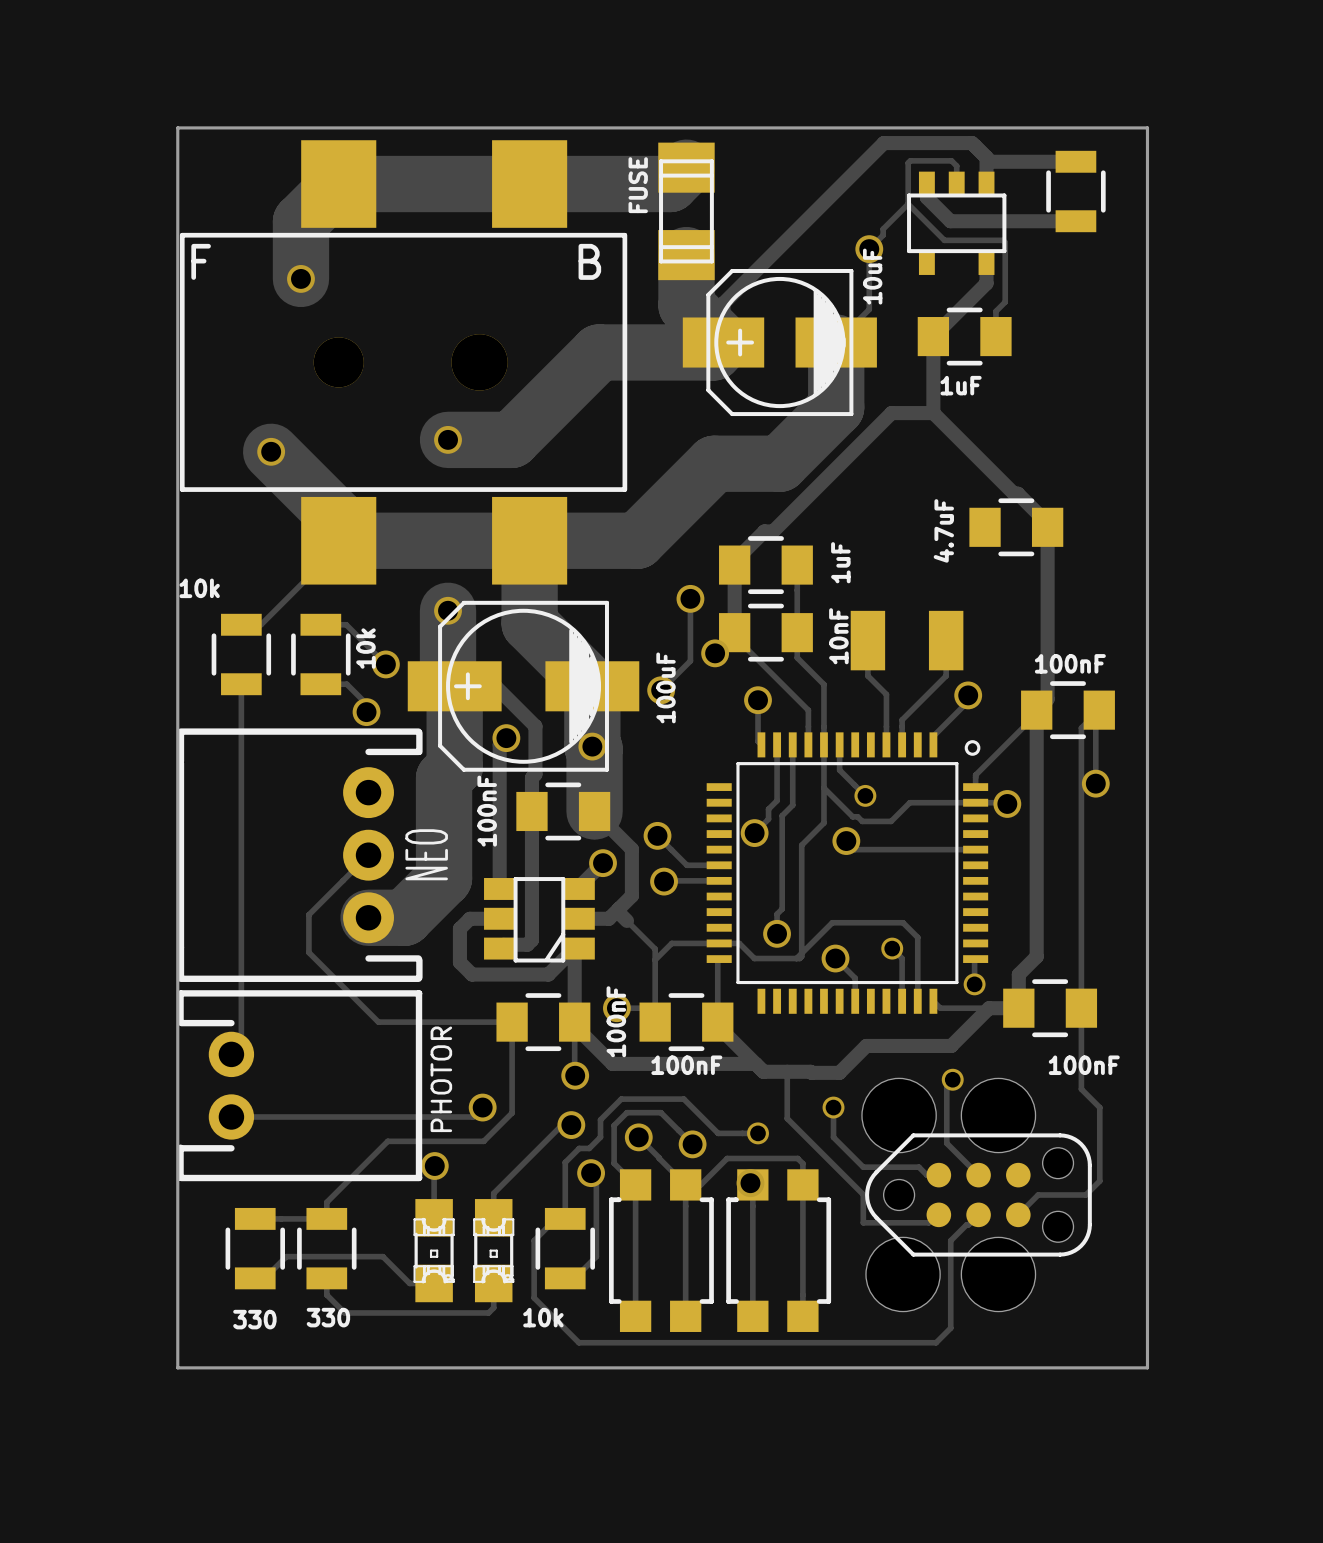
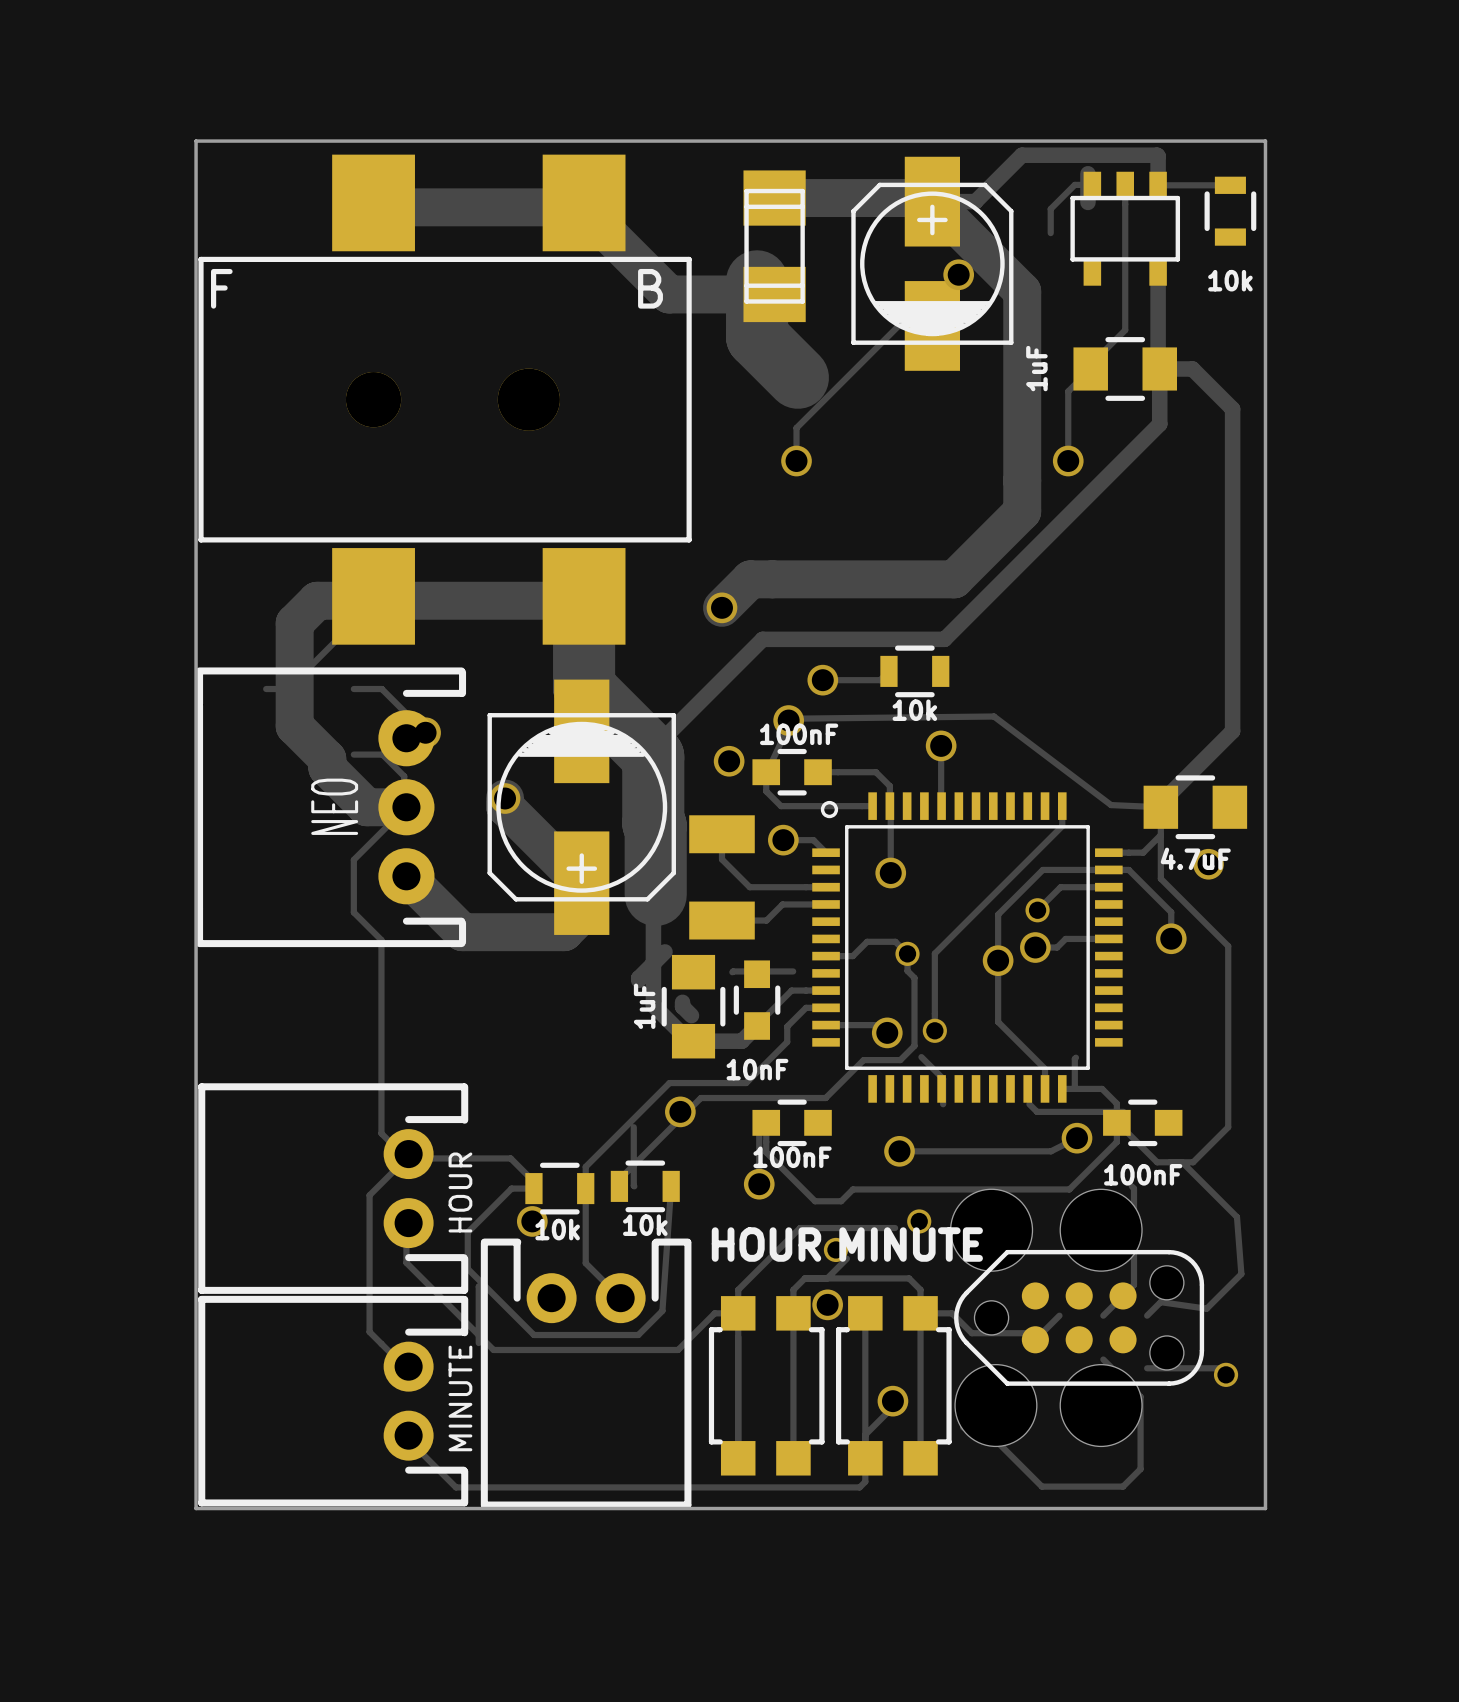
track: (1075, 161) (990, 161) (972, 143) (883, 143) (723, 303) (723, 342) (713, 352) (599, 352) (511, 439) (448, 439) -> none
track: (686, 167) (670, 184) (338, 184) (300, 221) (300, 278) -> none
track: none -> (1092, 184) (1074, 184) (1050, 209) (1050, 233)
track: none -> (1125, 184) (1125, 330) (1090, 364) (1090, 368) (1068, 391) (1068, 461)
track: none -> (1158, 184) (1157, 155) (1021, 155) (975, 201) (932, 201)
track: none -> (1158, 185) (1230, 185)
track: none -> (774, 198) (928, 198) (1022, 291) (1022, 511) (954, 579) (750, 579) (722, 607)
track: (926, 183) (926, 197) (950, 221) (1075, 221) -> none
track: (956, 183) (956, 166) (951, 160) (910, 160) (908, 163) (908, 204) -> none
part value: FUSE (638, 185) -> none
track: none -> (371, 207) (581, 207) (669, 294) (774, 294)
part: (1075, 191) -> none
part: none -> 10k (1230, 211)
track: (908, 204) (944, 240) (1003, 240) (1005, 242) (1005, 302) (995, 311) (995, 336) -> none
track: (908, 204) (883, 229) (883, 235) (869, 249) (869, 309) (836, 342) (836, 407) (779, 463) (714, 463) (637, 540) (338, 540) (338, 519) (271, 451) -> none
part position: (686, 211) -> (774, 246)
part position: (956, 223) -> (1125, 228)
part: none -> (932, 263)
track: none -> (1158, 272) (1158, 367) (1159, 368)
track: (986, 263) (986, 283) (933, 336) (933, 413) -> none
via: (300, 278) -> none
track: none -> (932, 325) (898, 325) (796, 427) (796, 461)
track: none -> (1159, 368) (1192, 368) (1232, 409) (1232, 731) (1160, 802) (1160, 807)
track: none -> (1159, 368) (1159, 424) (944, 639) (762, 639) (653, 748) (653, 1005) (689, 1041) (741, 1041) (791, 990) (826, 990)
part position: (964, 336) -> (1125, 368)
part: 10uF (779, 342) -> none
part value rotation: 0° (961, 385) -> 90° counterclockwise (1036, 368)
part value position: 1uF (961, 385) -> 1uF (1036, 368)
track: (933, 413) (1013, 493) (1017, 493) (1047, 523) (1047, 699) (1036, 710) (1036, 714) -> none
track: (933, 413) (891, 413) (773, 531) (764, 531) (734, 561) (734, 636) (808, 710) (808, 744) -> none
via: none -> (796, 461)
via: none -> (1068, 461)
via: (448, 439) -> none
via: (271, 451) -> none
part: 4.7uF (1016, 527) -> none
via: none -> (722, 607)
part: 1uF (765, 565) -> none
track: (797, 565) (797, 657) (823, 684) (823, 823) (801, 845) (801, 956) (799, 958) (754, 958) (739, 943) (671, 943) (655, 960) -> none
track: (690, 598) (690, 660) (661, 690) -> none
via: (690, 598) -> none
track: none -> (888, 671) (880, 680) (822, 680)
part: none -> 10k (914, 671)
track: (448, 610) (448, 679) (454, 686) -> none
via: (448, 610) -> none
via: none -> (822, 680)
part: 10nF (765, 632) -> none
track: (867, 640) (867, 675) (886, 694) (886, 744) -> none
part rotation: 0° (907, 640) -> 90° clockwise (722, 877)
part position: (907, 640) -> (722, 877)
track: (946, 640) (946, 675) (902, 719) (902, 744) -> none
part: 10k (241, 654) -> none
part: 10k (320, 654) -> none
track: none -> (581, 731) (581, 600) (317, 600) (294, 623) (294, 726) (327, 758) (327, 767) (366, 807) (406, 807) (353, 859) (353, 912) (381, 940) (381, 1133) (406, 1158)
part value: 100nF (1070, 663) -> 4.7uF (1195, 858)
track: none -> (941, 745) (941, 805)
via: none -> (941, 745)
track: (241, 684) (241, 1044) (231, 1054) -> none
track: (454, 686) (454, 767) (444, 778) (444, 878) (404, 917) (368, 917) -> none
track: (454, 686) (495, 686) (535, 726) (535, 774) (531, 777) (531, 940) (527, 944) (503, 944) (499, 948) (504, 948) -> none
part: 100uF (523, 686) -> none
track: (968, 695) (968, 701) (933, 736) (933, 744) -> none
via: (968, 695) -> none
part: none -> 100nF (792, 772)
track: none -> (818, 772) (875, 772) (889, 786) (890, 873)
track: (758, 700) (758, 741) (761, 744) -> none
via: (758, 700) -> none
part position: (1067, 710) -> (1195, 807)
track: (1099, 710) (1081, 728) (1081, 1089) (1099, 1107) (1099, 1181) -> (1182, 1162) (1236, 1217) (1241, 1274) (1212, 1302)
via: (366, 712) -> none
track: (1095, 713) (1095, 783) -> none
track: (1036, 714) (975, 775) (975, 787) -> none
track: (1036, 714) (1036, 956) (1018, 974) (1018, 1008) (989, 1008) (951, 1045) (866, 1045) (839, 1072) (763, 1071) (717, 1026) (719, 959) -> none
track: none -> (505, 798) (505, 806) (581, 883) (581, 914) (564, 932) (462, 932) (406, 876)
via: none -> (505, 798)
track: none -> (872, 806) (781, 806) (766, 791) (766, 772) (792, 718) (994, 716) (1111, 805) (1160, 807)
track: none -> (1062, 806) (1062, 826) (934, 953) (934, 1030)
part: none -> (581, 807)
track: none -> (1160, 807) (1160, 878) (1228, 946) (1228, 1127) (1193, 1162) (1157, 1162) (1116, 1122)
track: (506, 738) (499, 744) (499, 888) -> none
via: (506, 738) -> none
track: (777, 744) (777, 800) (768, 809) (768, 819) (754, 833) -> none
track: (792, 744) (792, 805) (782, 815) (782, 909) (777, 914) (777, 933) -> none
track: (839, 744) (839, 770) (865, 795) -> none
via: (592, 746) -> none
track: none -> (722, 834) (722, 859) (749, 887) (826, 887)
track: none -> (1160, 835) (1143, 852) (1108, 852)
track: none -> (783, 840) (813, 840) (826, 852)
via: none -> (783, 840)
track: (823, 788) (852, 816) (857, 816) (862, 821) (891, 821) (909, 802) (1007, 803) -> none
via: none -> (890, 873)
via: (865, 795) -> none
via: (1007, 803) -> none
track: none -> (1108, 887) (1060, 887) (1037, 910)
part: 100nF (563, 811) -> none
track: (594, 811) (631, 849) (631, 895) (608, 918) (579, 918) -> none
track: none -> (826, 904) (782, 904) (766, 920) (722, 920)
via: none -> (1037, 910)
via: (754, 833) -> none
track: (657, 835) (686, 865) (719, 865) -> none
via: (657, 835) -> none
track: (846, 841) (854, 849) (975, 849) -> none
via: (846, 841) -> none
track: none -> (1108, 938) (1065, 938) (1057, 947) (1035, 947)
track: none -> (1171, 938) (1171, 912) (1128, 869) (1042, 869) (998, 914) (998, 1022) (1045, 1068) (1045, 1088)
via: none -> (1171, 938)
part value position: NEO (426, 854) -> NEO (334, 806)
part position: (300, 855) -> (330, 807)
track: (368, 855) (308, 914) (308, 952) (378, 1022) (512, 1022) (512, 1113) (483, 1141) (387, 1141) (326, 1202) (326, 1218) (255, 1218) -> none
via: none -> (1035, 947)
via: (603, 863) -> none
via: none -> (907, 953)
track: none -> (826, 956) (852, 956) (867, 941) (895, 941) (907, 953) (907, 970) (914, 977) (914, 1045) (900, 1060) (863, 1060) (825, 1098) (700, 1098) (619, 1179) (619, 1186)
via: none -> (998, 960)
part rotation: 0° (847, 873) -> 90° counterclockwise (967, 947)
via: (664, 881) -> none
part: none -> 10nF (757, 1000)
part: none -> 1uF (693, 1006)
track: none -> (826, 1007) (806, 1007) (787, 1026) (787, 1041) (746, 1083) (669, 1083) (585, 1166) (585, 1263) (620, 1298)
track: (499, 918) (469, 918) (459, 928) (459, 962) (472, 974) (548, 974) (574, 948) (579, 948) (574, 953) (574, 1026) (612, 1063) (755, 1063) -> none
track: (624, 918) (655, 949) (655, 1022) (641, 1008) (616, 1008) -> none
part: (539, 919) -> none
track: none -> (826, 1025) (879, 1025) (887, 1032)
via position: (777, 933) -> (887, 1032)
track: (892, 948) (902, 958) (902, 1001) -> none
via position: (892, 948) -> (934, 1030)
track: (796, 958) (832, 922) (903, 922) (917, 937) (917, 1001) -> none
via: (835, 958) -> none
part footprint: [1003, 979, 1098, 1038] -> [1103, 1099, 1183, 1147]
via: (974, 984) -> none
track: none -> (1062, 1088) (1102, 1088) (1116, 1103) (1116, 1141) (1069, 1189) (853, 1189) (841, 1201) (815, 1201) (766, 1152) (766, 1122) (759, 1129) (759, 1184)
part: none -> 100nF (792, 1122)
part: 100nF (543, 1022) -> none
part: 100nF (686, 1022) -> none
track: none -> (1077, 1138) (1051, 1151) (899, 1151)
via: none -> (1077, 1138)
via: none -> (899, 1151)
track: none -> (406, 1158) (510, 1158) (533, 1181) (533, 1188) (511, 1188) (467, 1232) (467, 1268) (533, 1335) (638, 1335) (662, 1310) (671, 1186)
track: none -> (406, 1158) (369, 1195) (369, 1331) (406, 1368)
part value position: 100nF (1084, 1065) -> 100nF (1143, 1174)
track: (787, 1071) (787, 1118) (863, 1194) (863, 1222) (928, 1222) (936, 1214) -> none
via: none -> (759, 1184)
via: (575, 1075) -> none
part: none -> 10k (645, 1186)
track: none -> (1131, 1186) (1133, 1188) (1133, 1285) (1103, 1315)
part: none -> 10k (559, 1188)
part value: PHOTOR (441, 1079) -> HOUR (460, 1192)
track: (952, 1079) (946, 1085) (946, 1143) (978, 1175) -> none
via: (952, 1079) -> none
part rotation: 0° (299, 1085) -> 180° (333, 1188)
track: (482, 1107) (473, 1116) (231, 1116) -> none
track: (833, 1107) (833, 1137) (863, 1167) (918, 1167) (926, 1175) (938, 1175) -> none
track: none -> (406, 1227) (406, 1262) (493, 1349) (678, 1349) (714, 1313) (738, 1313)
track: none -> (895, 1228) (800, 1228) (738, 1289) (738, 1458)
track: (571, 1125) (562, 1125) (493, 1193) (493, 1217) -> none
via: (571, 1125) -> none
track: (758, 1133) (718, 1133) (683, 1099) (621, 1099) (600, 1119) (600, 1137) (589, 1148) (579, 1148) (565, 1162) (565, 1218) (555, 1218) (534, 1240) (534, 1297) (578, 1342) (936, 1342) (950, 1328) (950, 1240) (978, 1214) -> none
track: (638, 1137) (685, 1184) -> none
via: (638, 1137) -> none
track: none -> (846, 1258) (827, 1278)
track: (692, 1144) (660, 1112) (626, 1112) (614, 1125) (614, 1163) (635, 1184) (635, 1316) -> none
via: (692, 1144) -> none
via: (434, 1166) -> none
track: (591, 1173) (596, 1178) (596, 1256) (574, 1278) (565, 1278) -> none
via: (591, 1173) -> none
track: (750, 1183) (752, 1184) (752, 1316) -> none
track: (685, 1184) (685, 1316) -> none
track: (685, 1184) (700, 1184) (727, 1158) (797, 1158) (802, 1163) (802, 1316) -> none
track: (1094, 1186) (1085, 1194) (1038, 1194) (1018, 1214) -> (1206, 1308) (1160, 1302) (1147, 1315)
track: none -> (865, 1313) (865, 1481) (859, 1487) (455, 1487) (406, 1437)
track: none -> (920, 1313) (951, 1313) (971, 1333) (1041, 1333) (1059, 1315)
track: none -> (1103, 1359) (1140, 1396) (1140, 1469) (1123, 1486) (1041, 1486) (982, 1427) (963, 1427)
track: none -> (1147, 1368) (1219, 1368)
part: none -> (586, 1373)
via: none -> (1226, 1374)
part: 330 (255, 1248) -> none
part: 330 (326, 1248) -> none
part: 10k (565, 1248) -> none
part: (434, 1250) -> none
part: (493, 1250) -> none
part: (661, 1250) -> none
part: (778, 1250) -> none
part: none -> HOUR (766, 1385)
part: none -> MINUTE (893, 1385)
part: none -> MINUTE (333, 1401)
track: none -> (892, 1401) (892, 1407) (865, 1434)
via: none -> (892, 1401)
track: (255, 1278) (264, 1278) (286, 1256) (382, 1256) (409, 1283) (434, 1283) -> none
track: (326, 1278) (326, 1294) (344, 1312) (488, 1312) (493, 1307) (493, 1283) -> none
track: none -> (793, 1458) (793, 1289) (804, 1278) (909, 1278) (920, 1289) (920, 1458)

